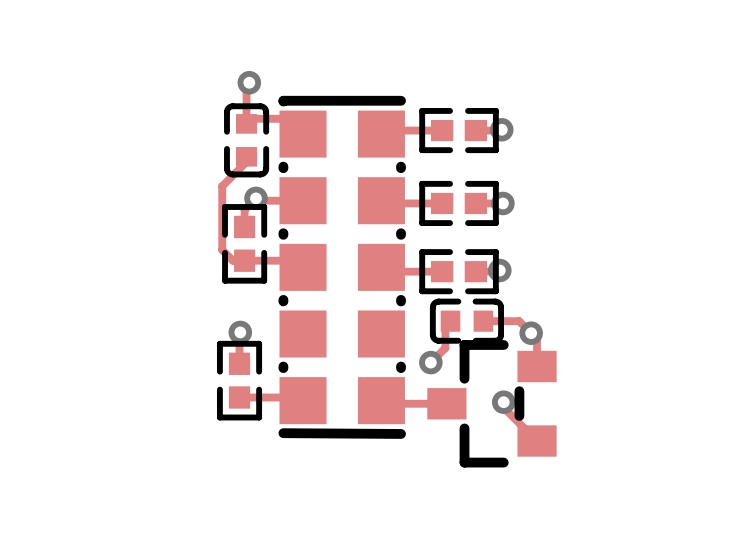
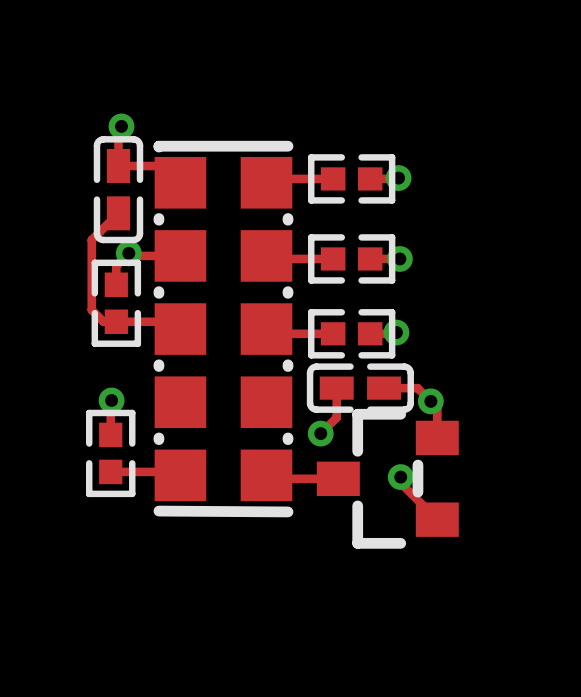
part footprint: [224, 103, 270, 178] -> [93, 136, 144, 244]
part footprint: [429, 298, 505, 344] -> [306, 363, 414, 413]

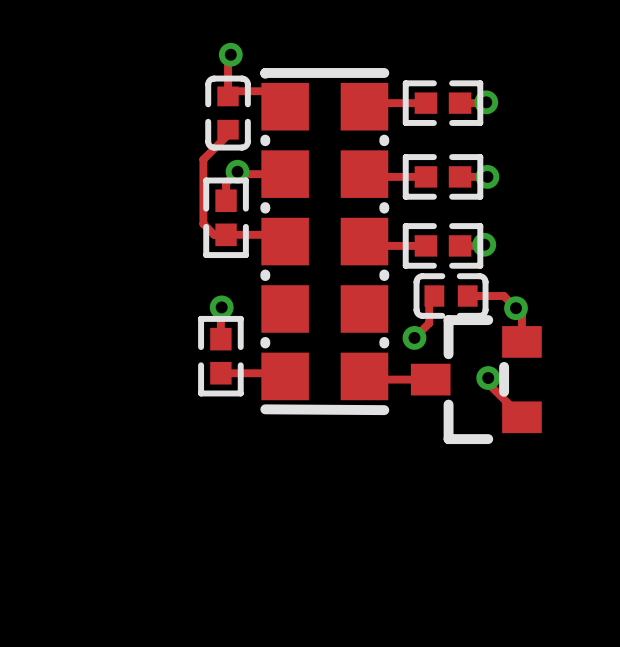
part footprint: [93, 136, 144, 244] -> [205, 75, 251, 151]
part footprint: [306, 363, 414, 413] -> [413, 273, 489, 319]

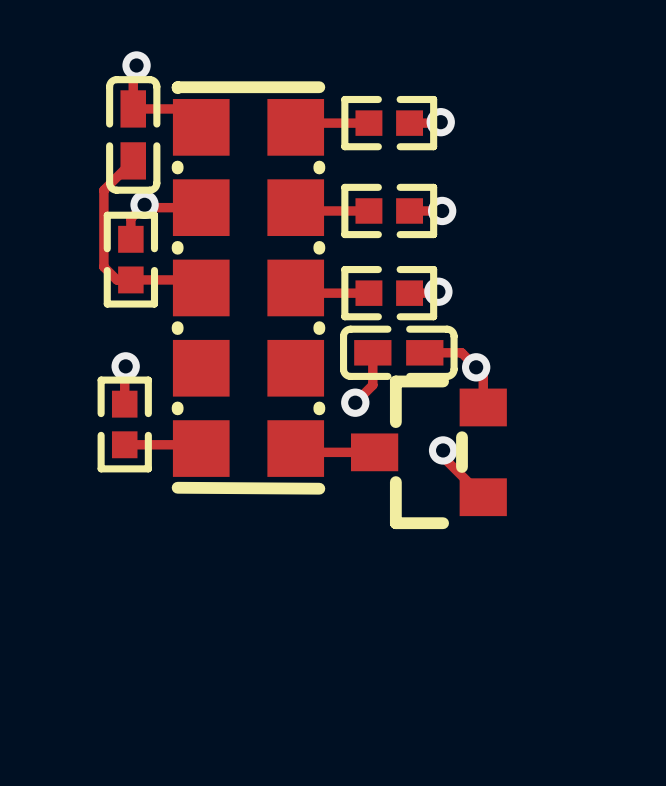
part footprint: [205, 75, 251, 151] -> [106, 76, 161, 194]
part footprint: [413, 273, 489, 319] -> [339, 325, 458, 380]

